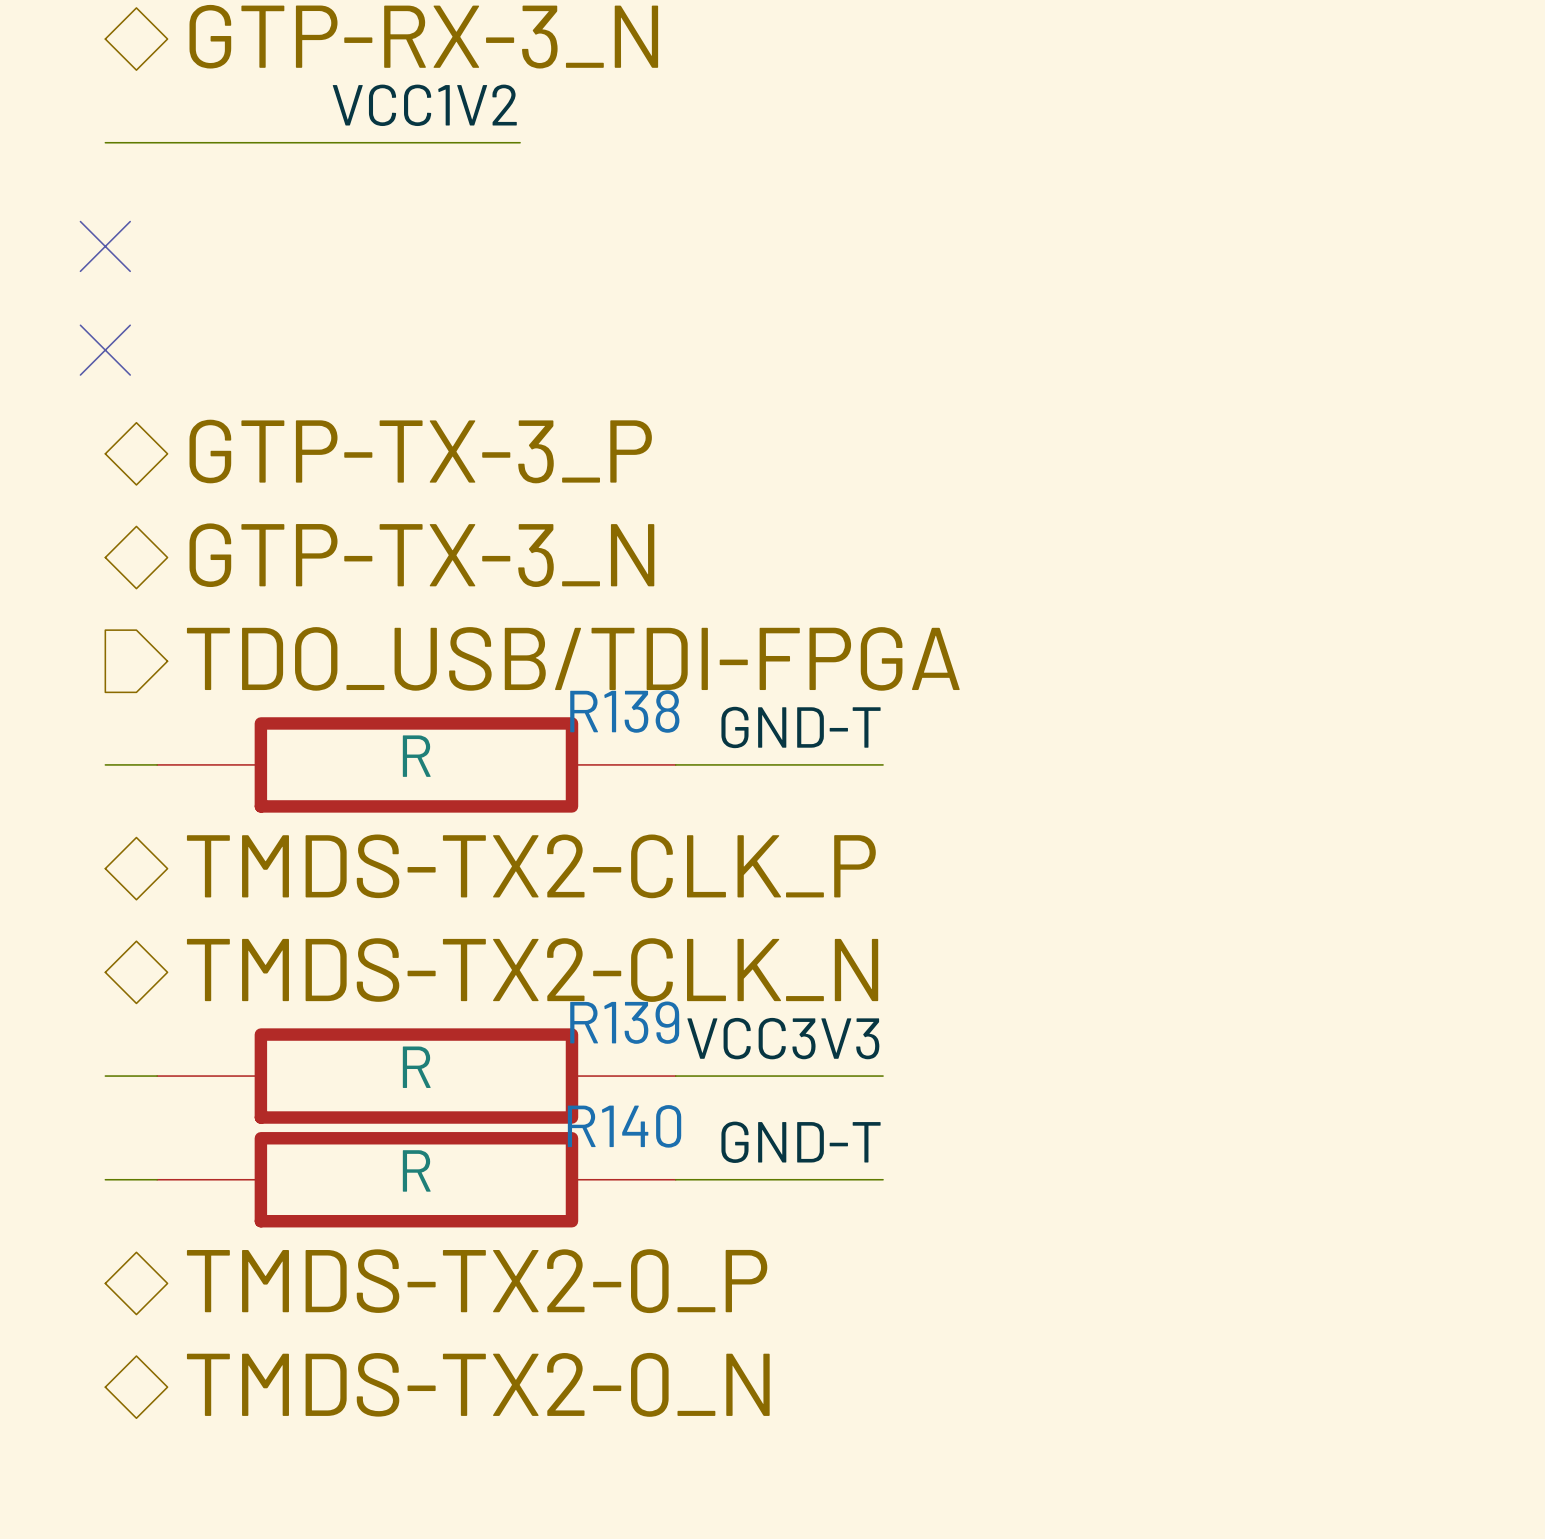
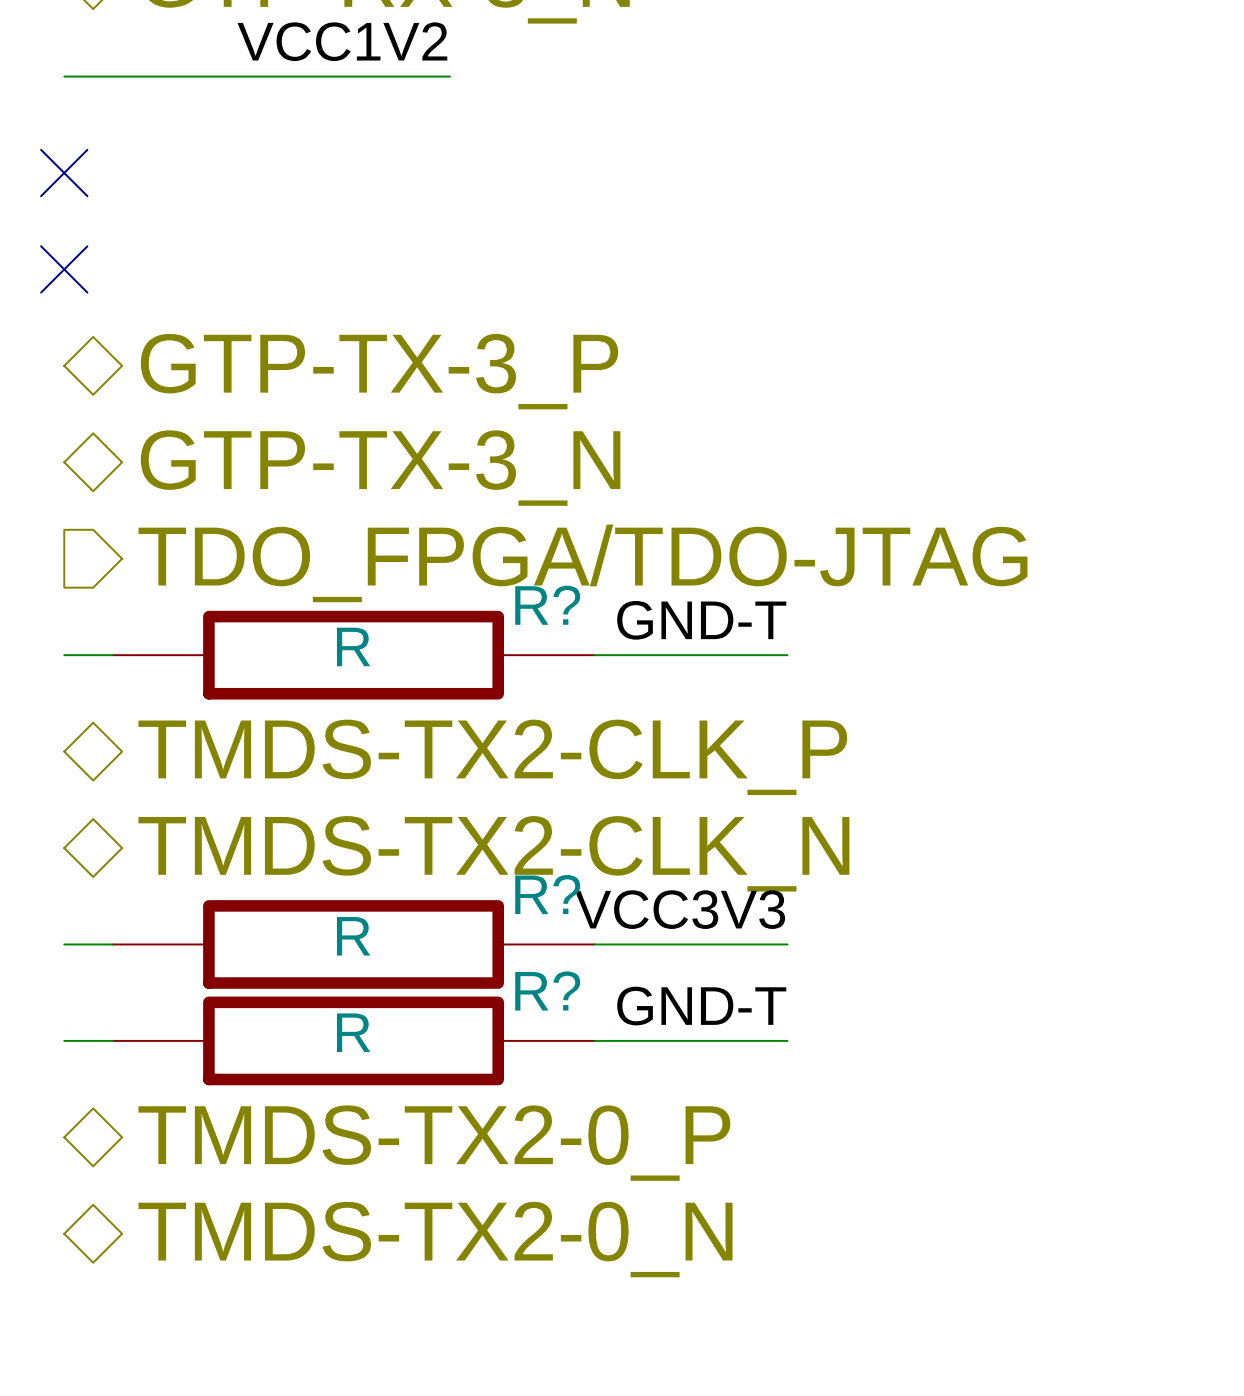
hierarchical label: TDO_USB/TDI-FPGA (573, 658) -> TDO_FPGA/TDO-JTAG (582, 563)
R138 name: R138 (624, 711) -> R? (547, 605)
R139 name: R139 (624, 1022) -> R? (547, 894)
R140 name: R140 (624, 1126) -> R? (547, 990)

